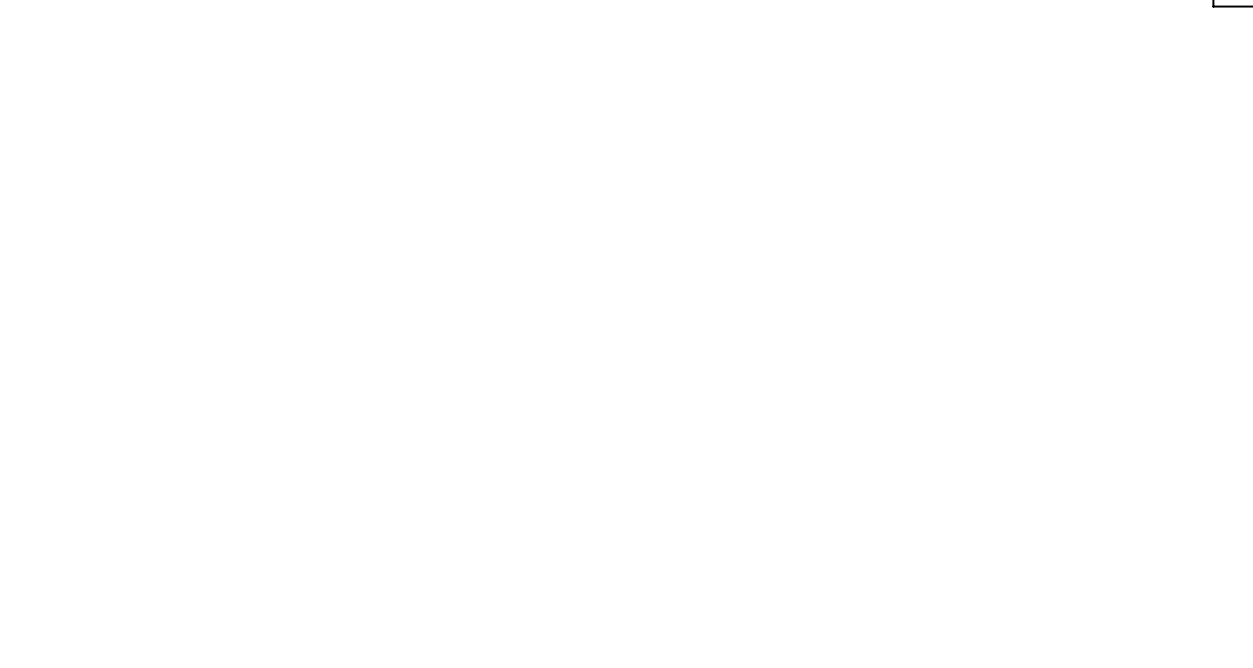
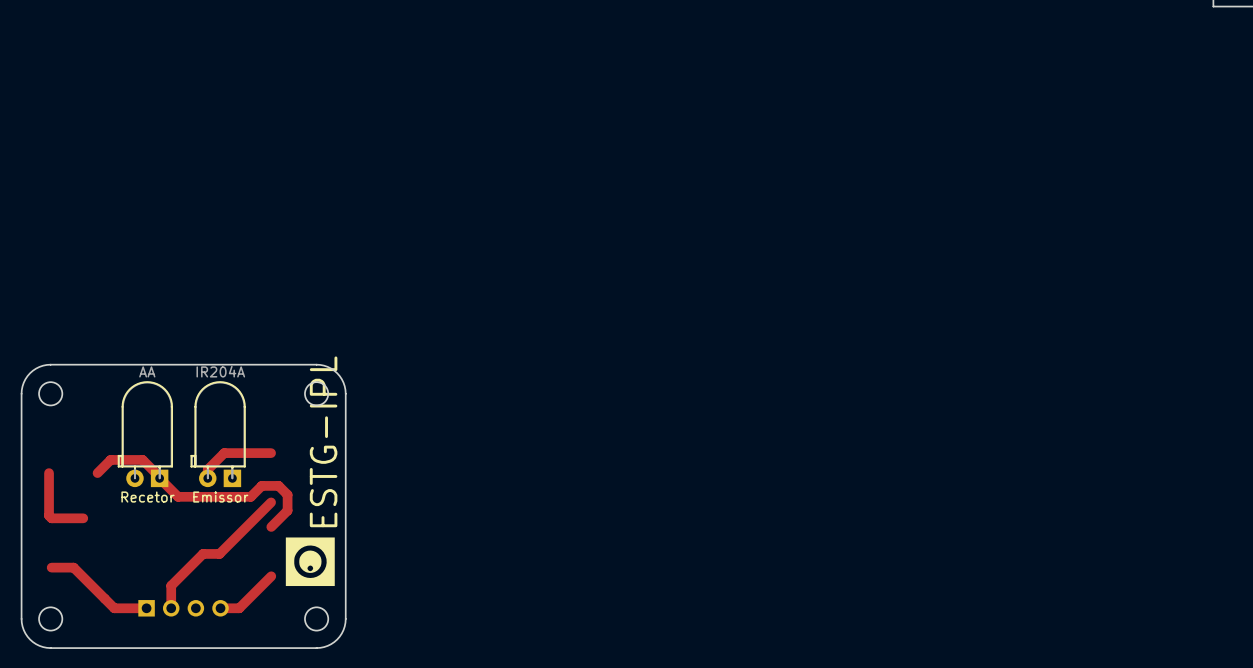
board edge: none -> (316, 364) (50, 364) (39, 366) (30, 373) (23, 382) (21, 393) (21, 618) (23, 630) (30, 639) (39, 645) (50, 648) (316, 648) (327, 645) (337, 639) (343, 630) (345, 618) (345, 389) (337, 373) (327, 366) (316, 364)
round board edge: none -> [38, 381, 63, 406]
round board edge: none -> [304, 381, 329, 406]
Recetor: none -> AA (145, 434)
Emissor: none -> IR204A (218, 434)
text: none -> ESTG-IPL (323, 441)
top track: none -> (271, 453) (224, 453) (207, 469) (207, 478)
top track: none -> (49, 473) (49, 515) (51, 518) (83, 518)
top track: none -> (97, 473) (110, 459) (142, 459) (178, 496) (250, 496) (261, 485) (278, 485) (287, 494) (287, 510) (271, 526)
top track: none -> (271, 502) (219, 553) (203, 553) (171, 585) (171, 608)
drawing: none -> [285, 537, 335, 587]
top track: none -> (51, 567) (73, 567) (114, 608) (146, 608)
top track: none -> (271, 576) (239, 608) (220, 608)
round board edge: none -> [38, 607, 63, 631]
round board edge: none -> [304, 607, 329, 631]
part: none -> (183, 608)

